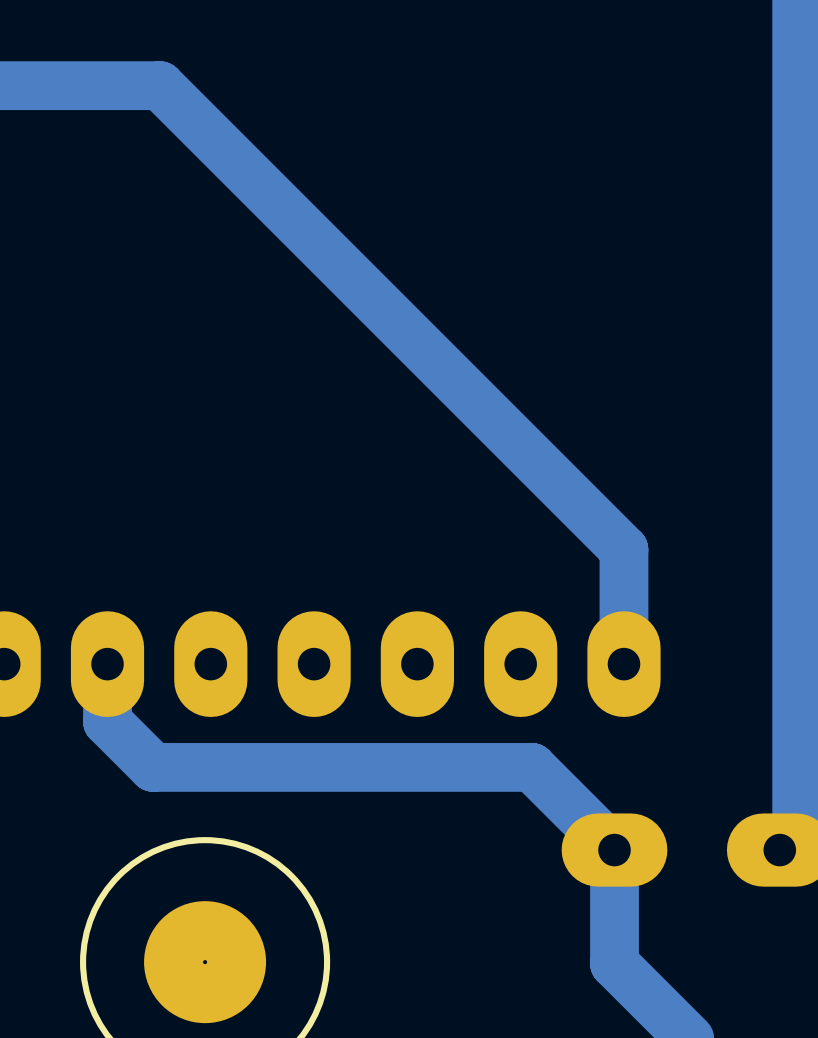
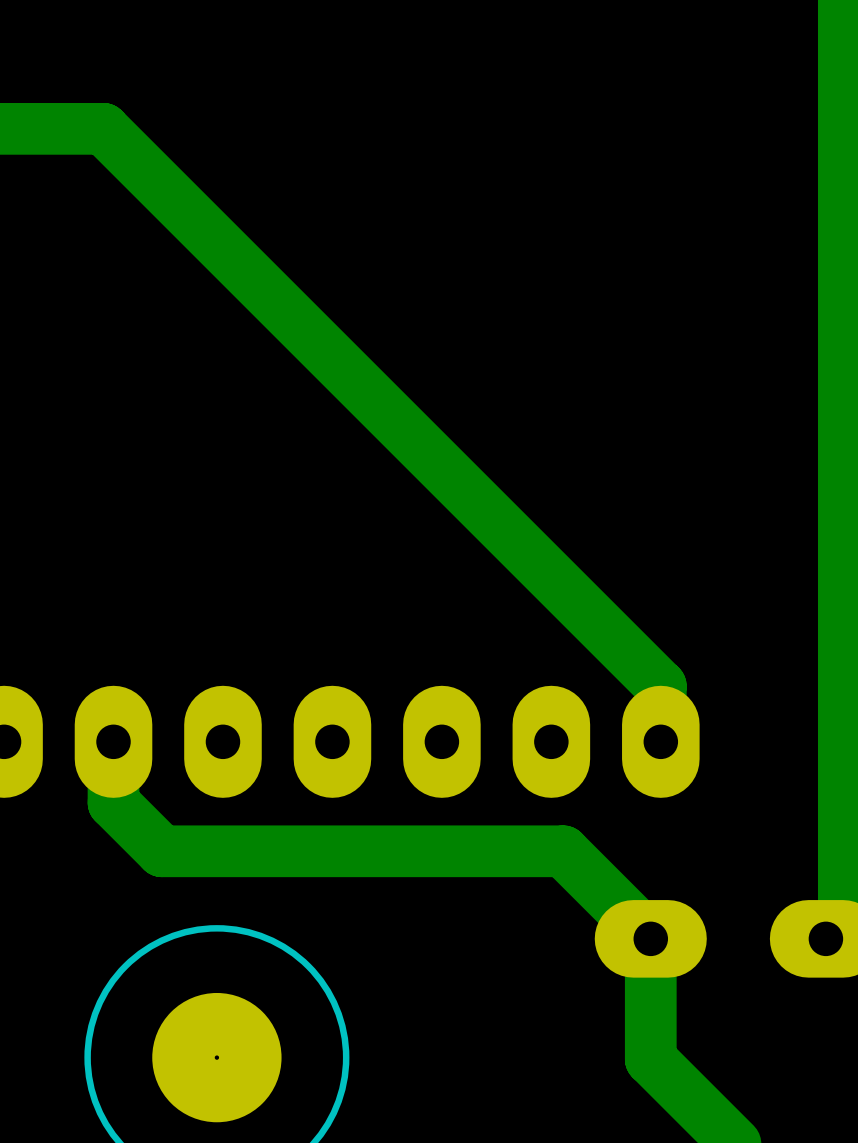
bottom track: (98, 85) (160, 85) (623, 549) (623, 611) -> (103, 128) (660, 686)

